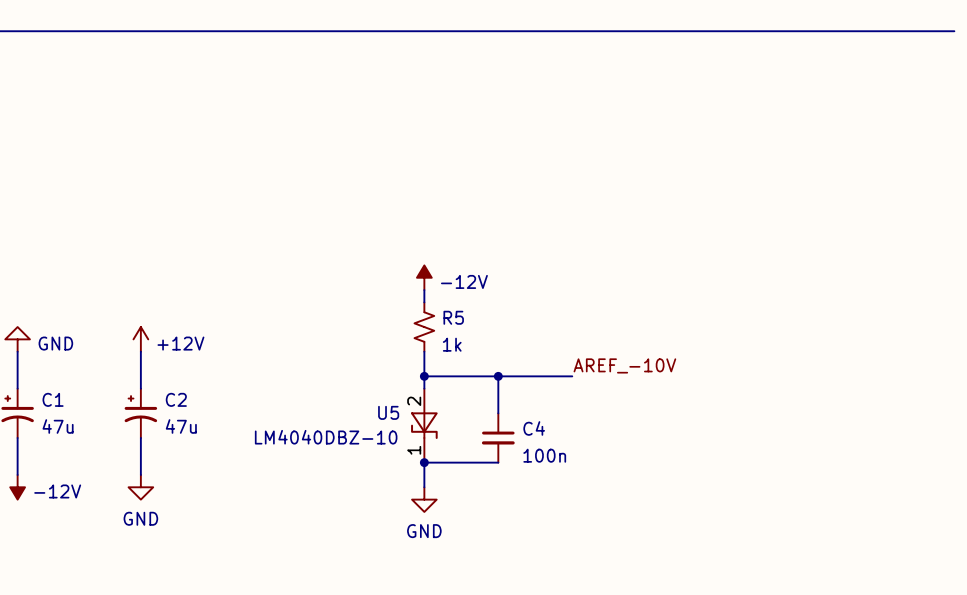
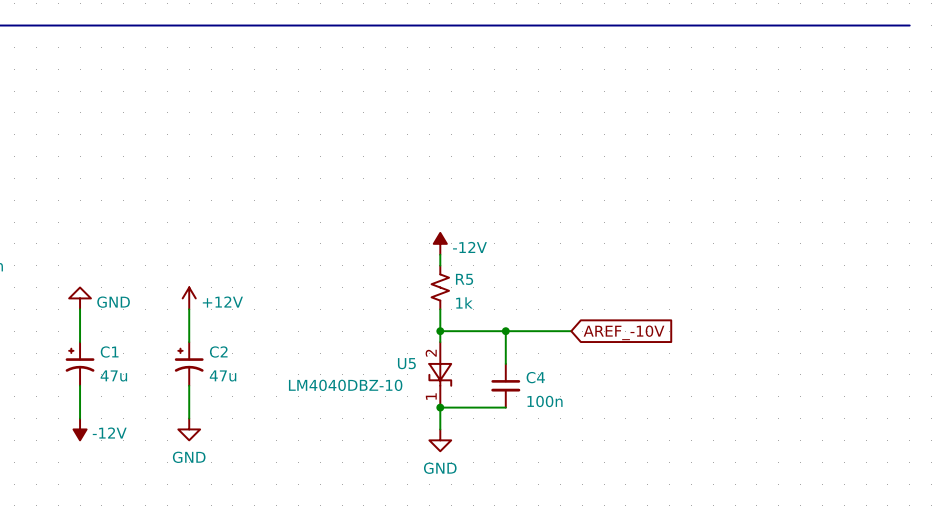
label: AREF_-10V (624, 365) -> none
global label: none -> AREF_-10V (624, 332)

